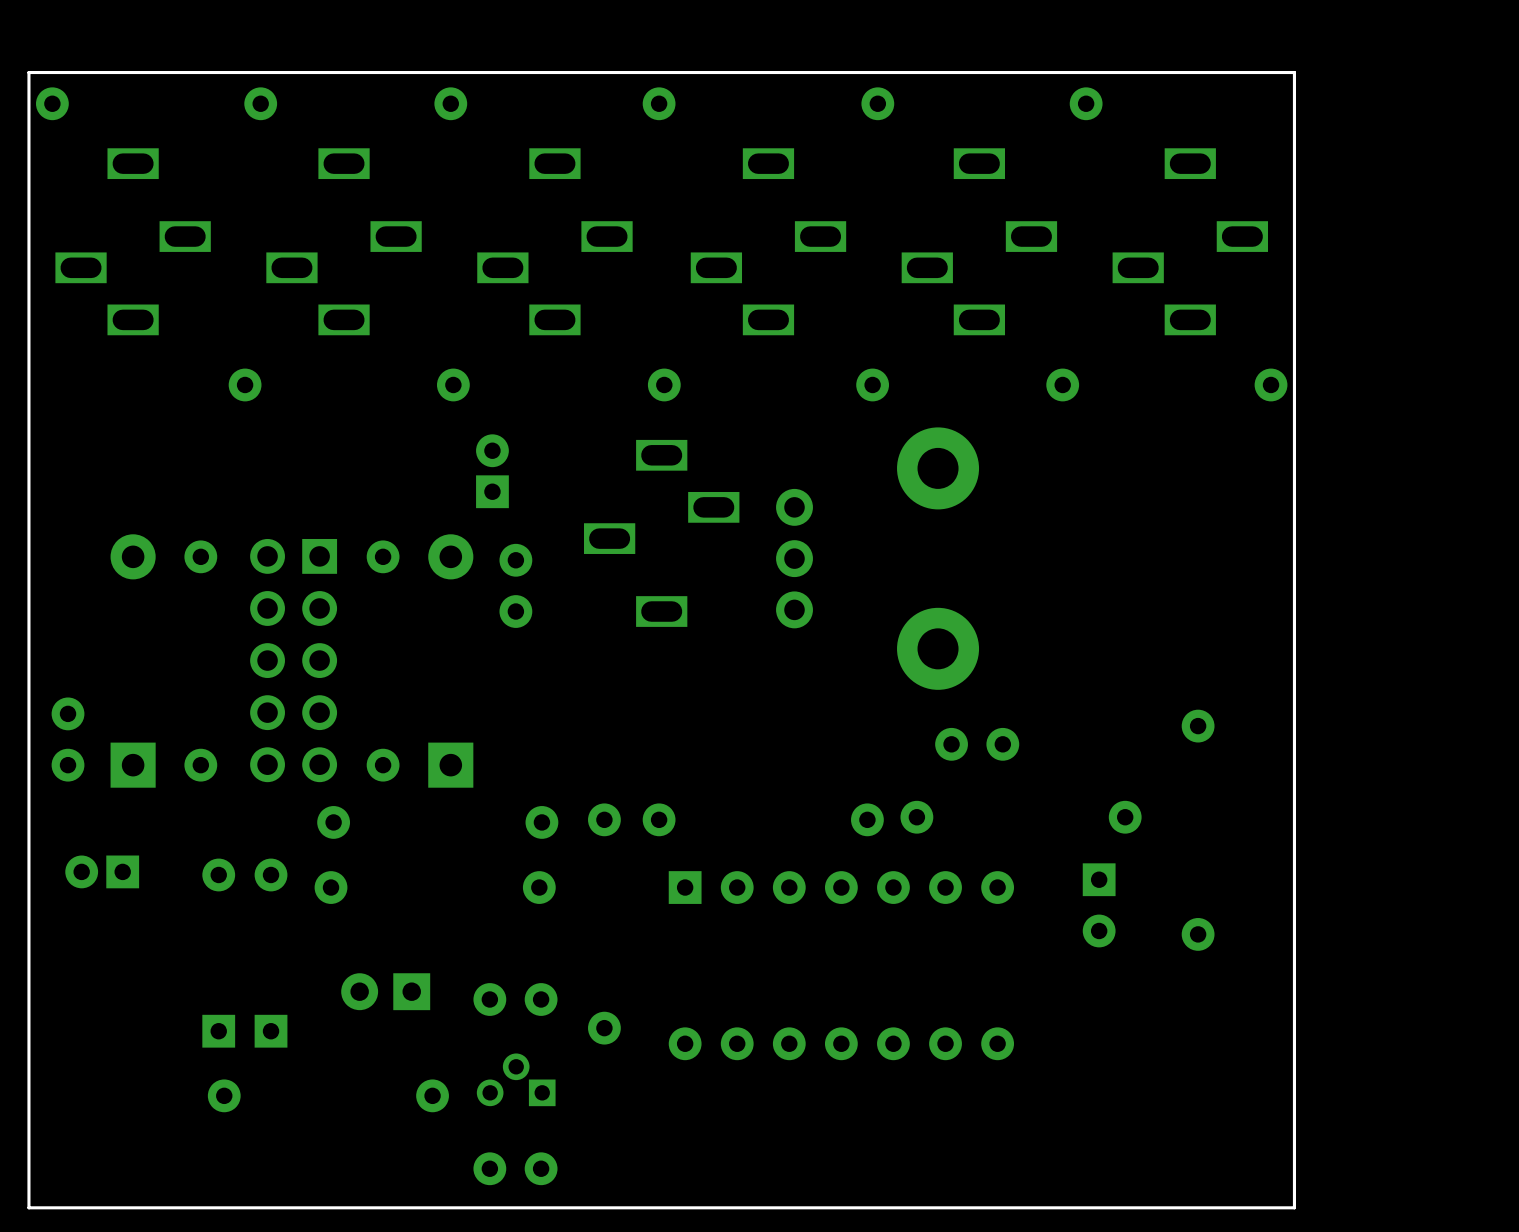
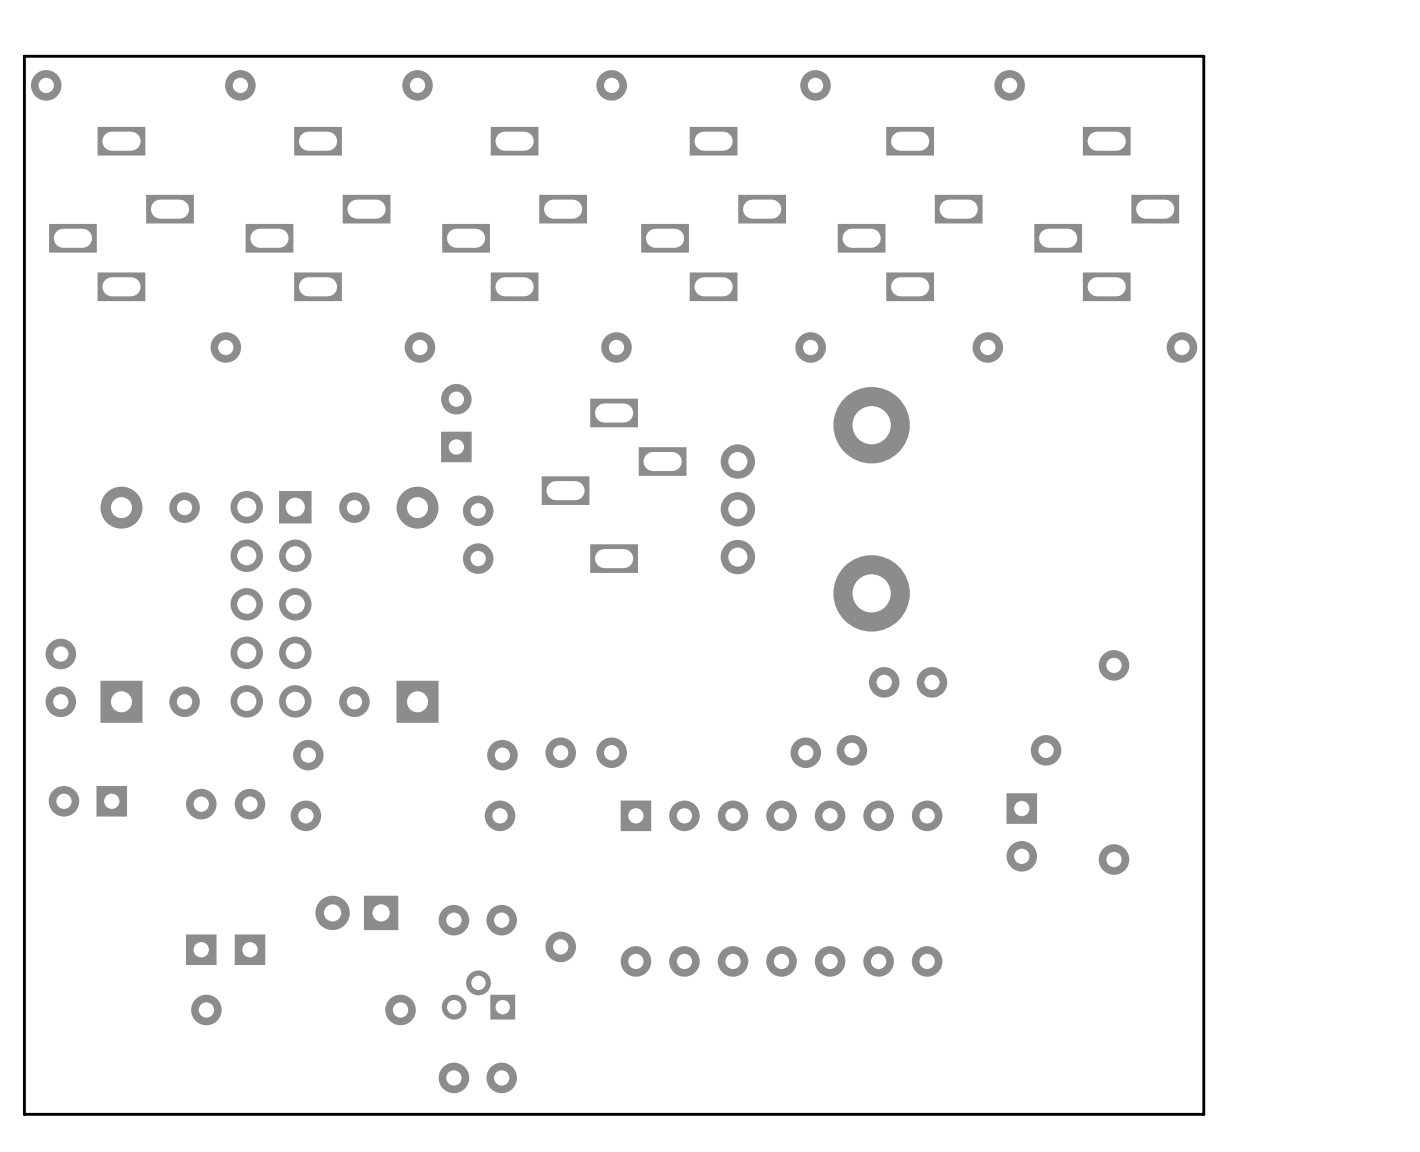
part footprint: [476, 434, 509, 509] -> [441, 383, 472, 463]
part footprint: [65, 855, 140, 889] -> [48, 785, 128, 817]

